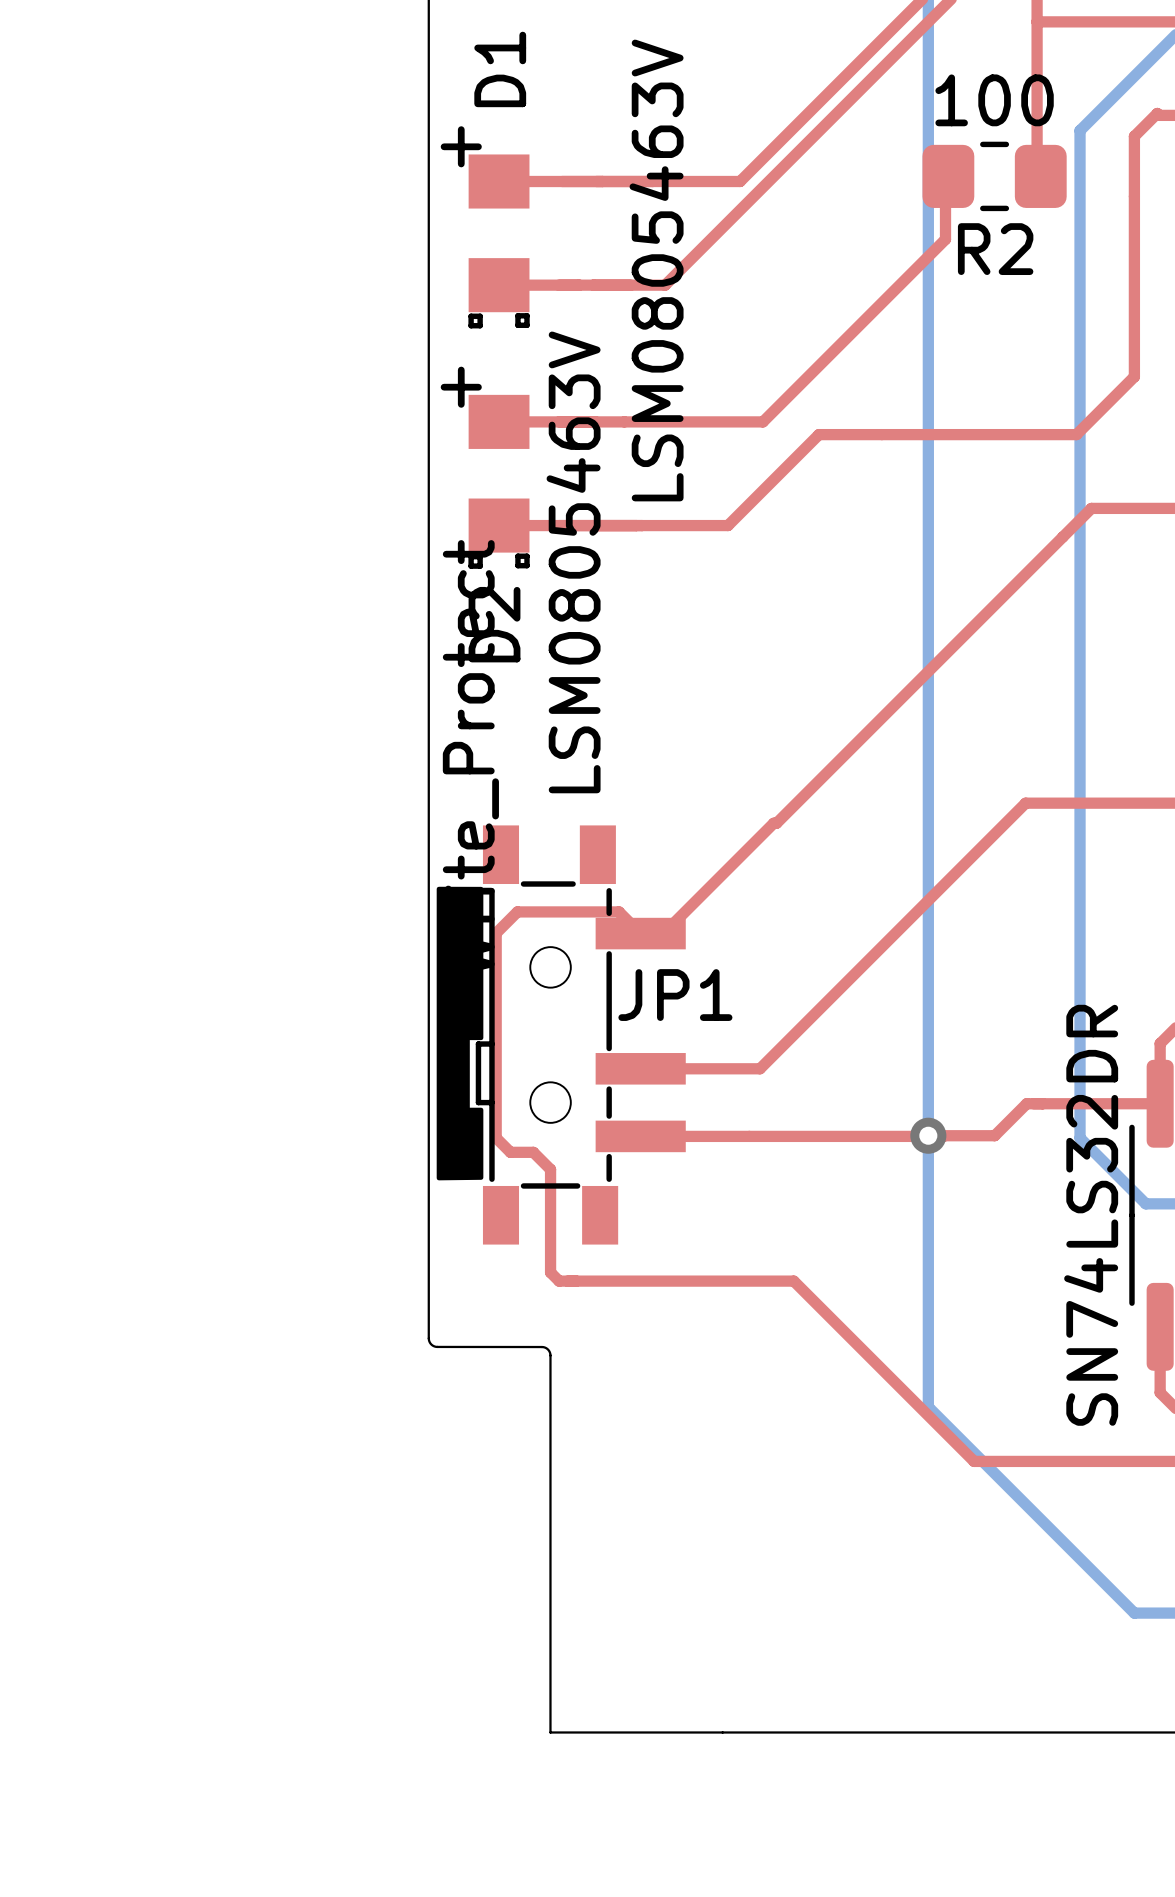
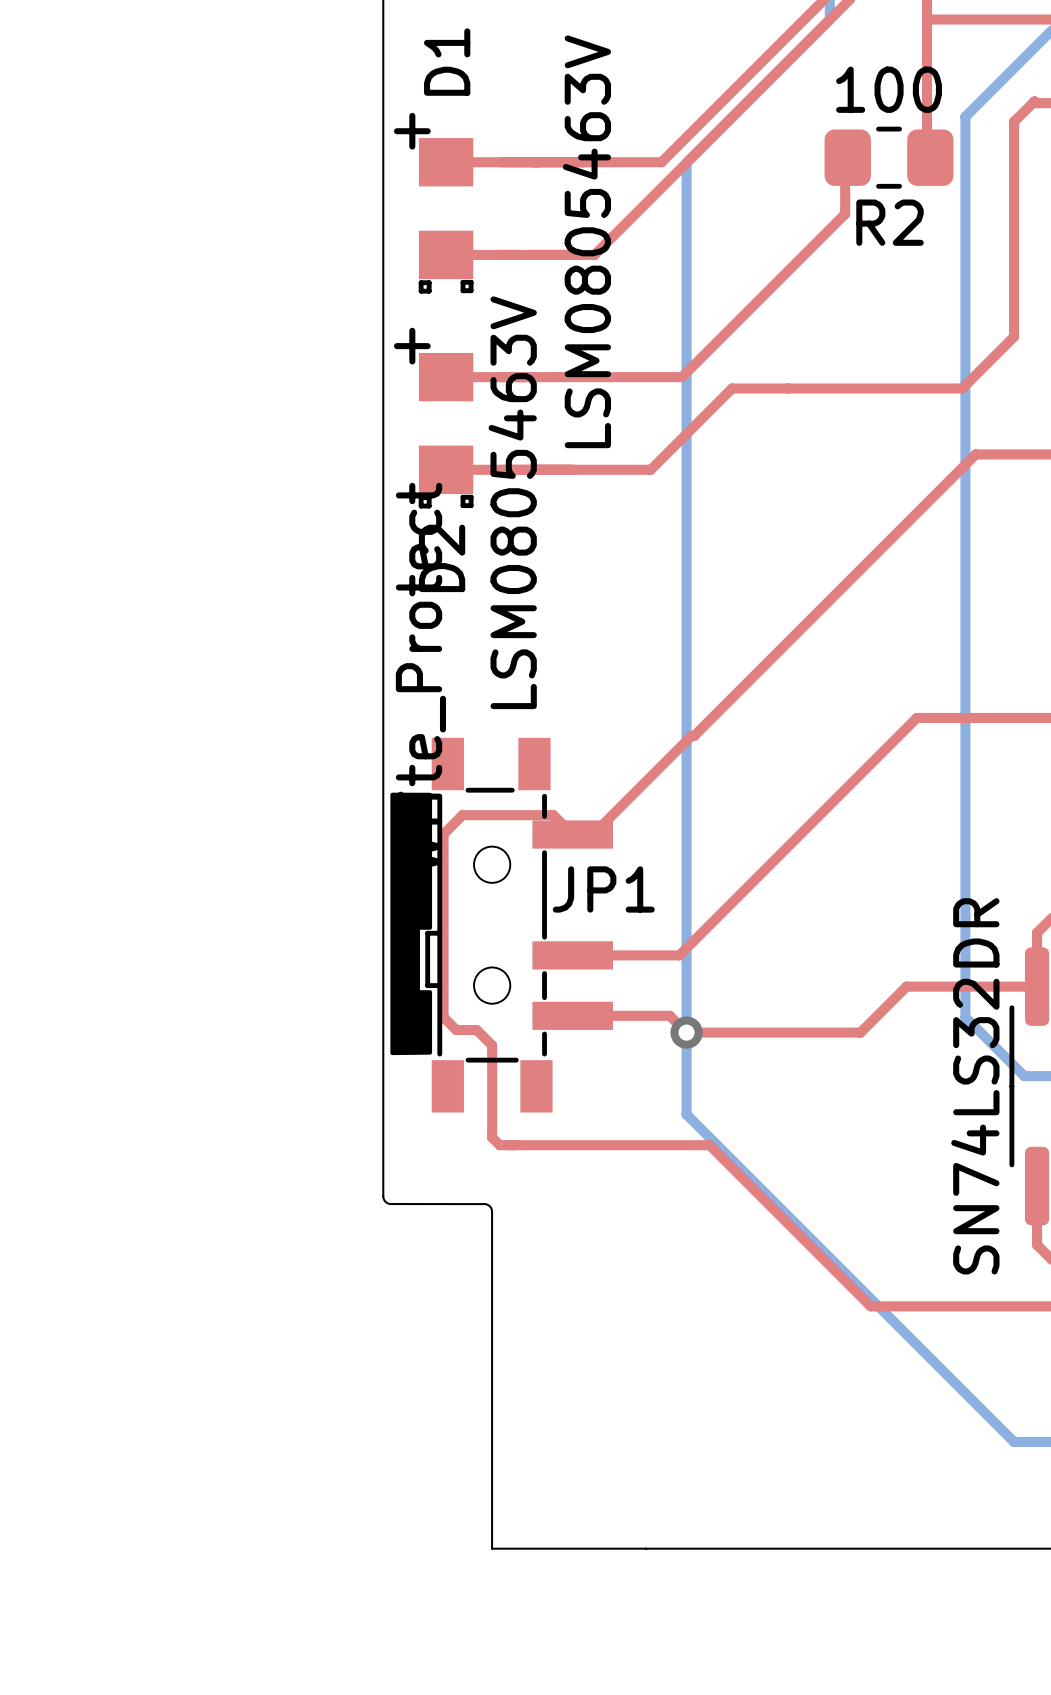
bottom track: (928, 21) (928, 1407) -> (829, 19) (686, 162) (686, 1114) (829, 1257)
top track: (1026, 1103) (994, 1135) (928, 1135) -> none
via position: (928, 1135) -> (686, 1032)
top track: (749, 1136) (943, 1136) -> (669, 1015) (686, 1032) (860, 1032) (906, 986) (917, 986)

